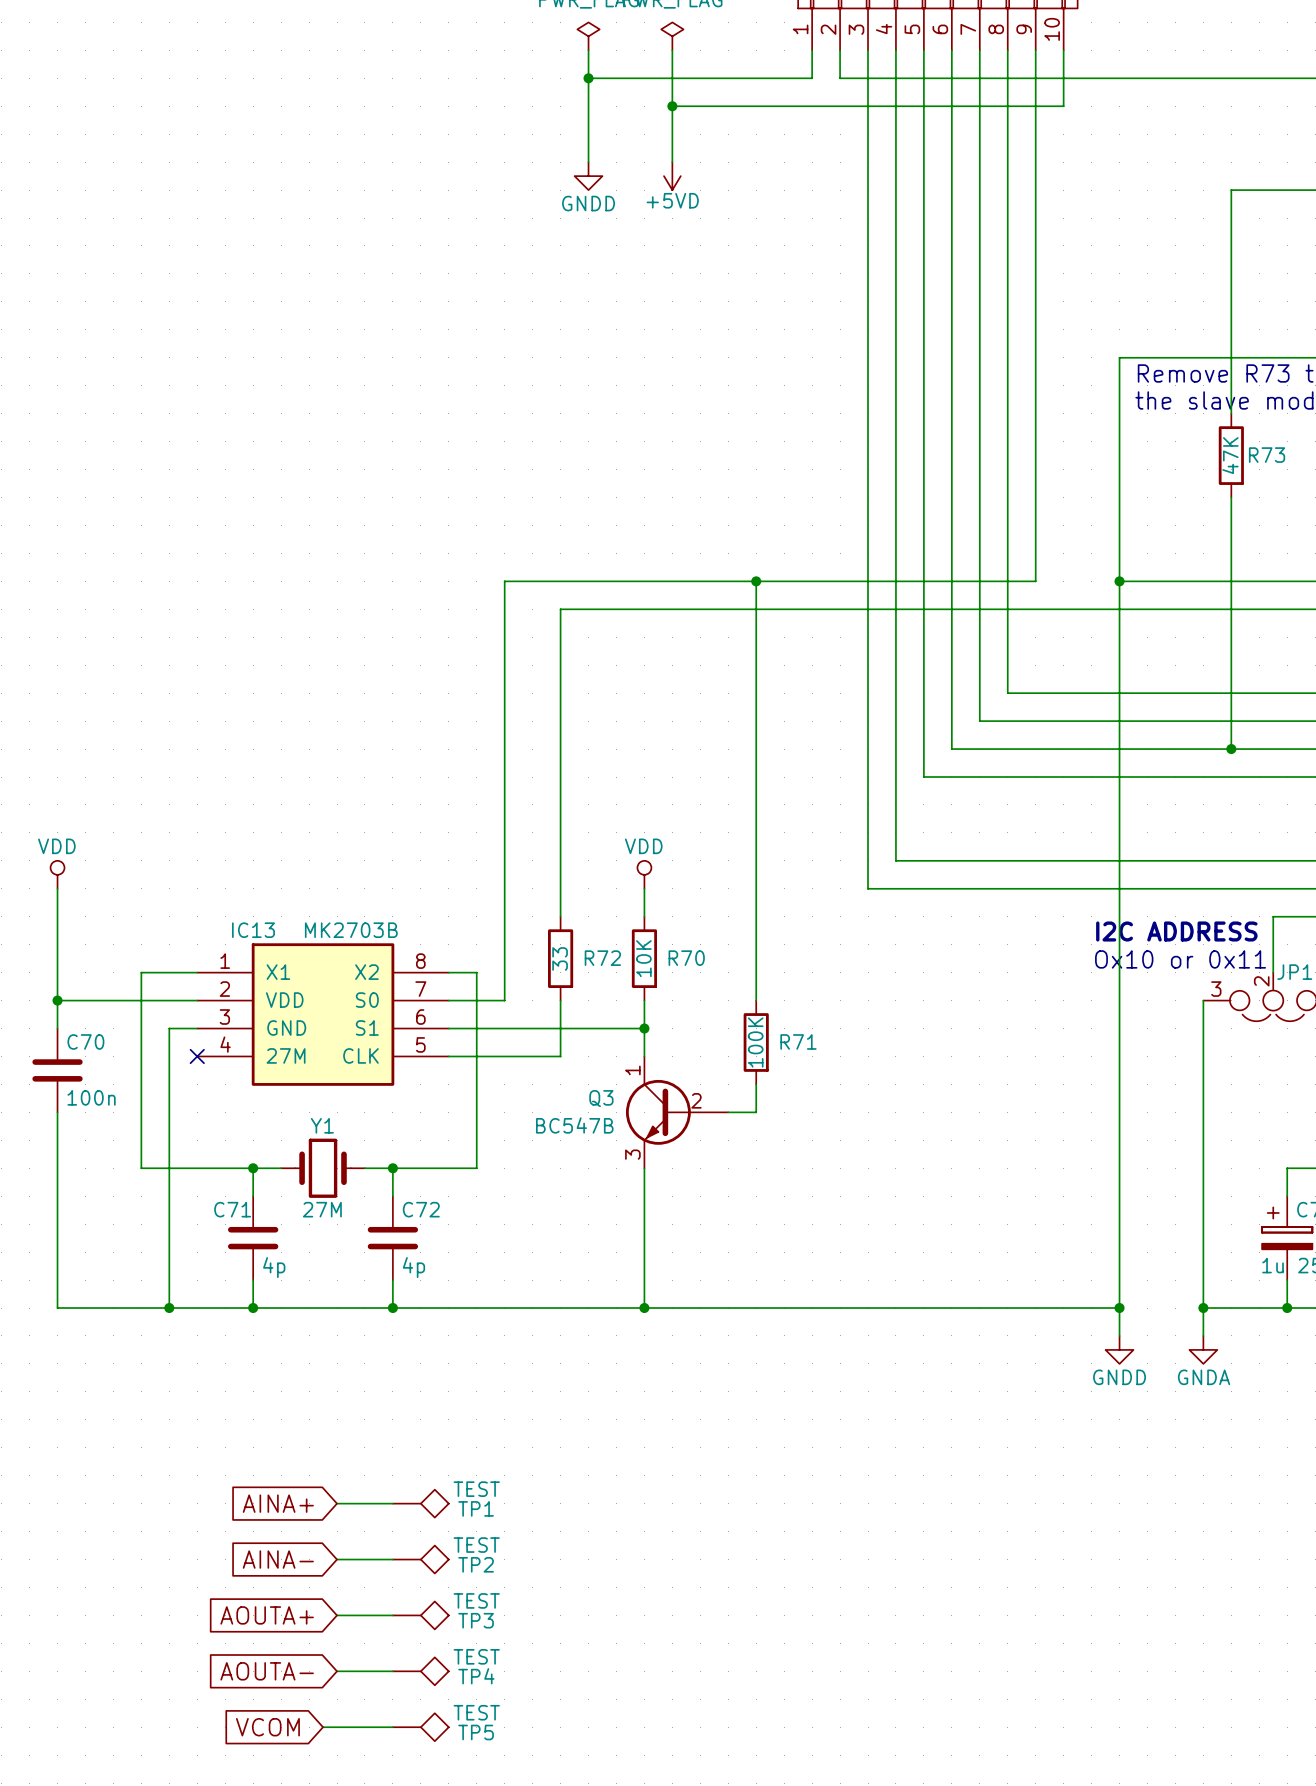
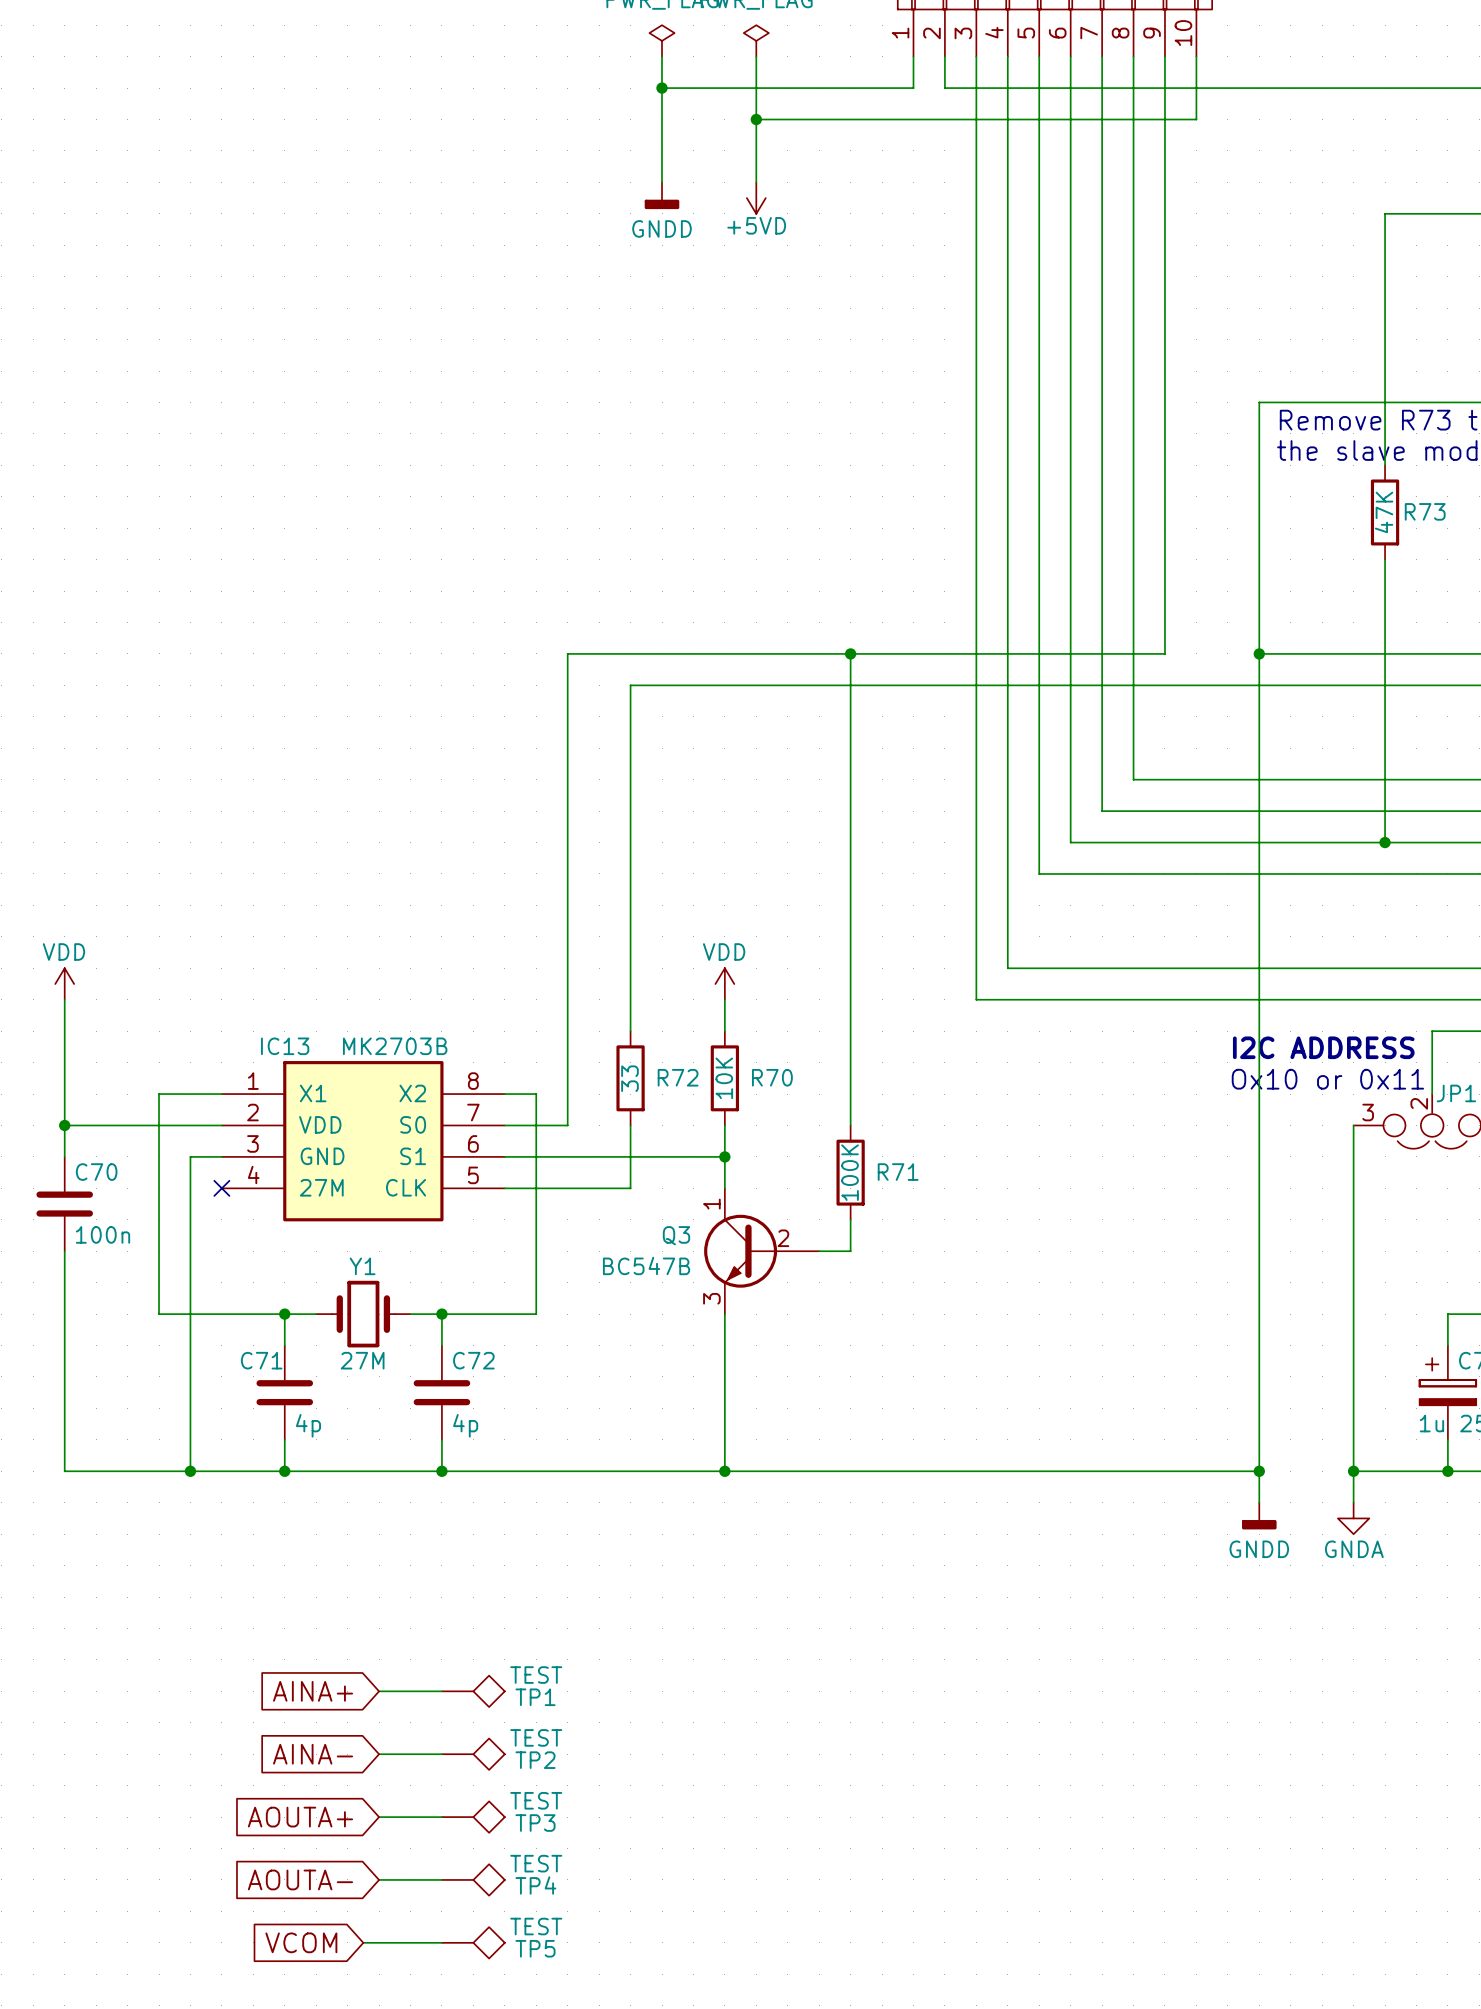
power symbol shape: [574, 162, 603, 191] -> [644, 182, 680, 210]
power symbol shape: [50, 860, 65, 889] -> [55, 968, 75, 1000]
power symbol shape: [637, 860, 652, 889] -> [715, 968, 735, 1000]
power symbol shape: [1105, 1335, 1134, 1364] -> [1242, 1502, 1277, 1530]

